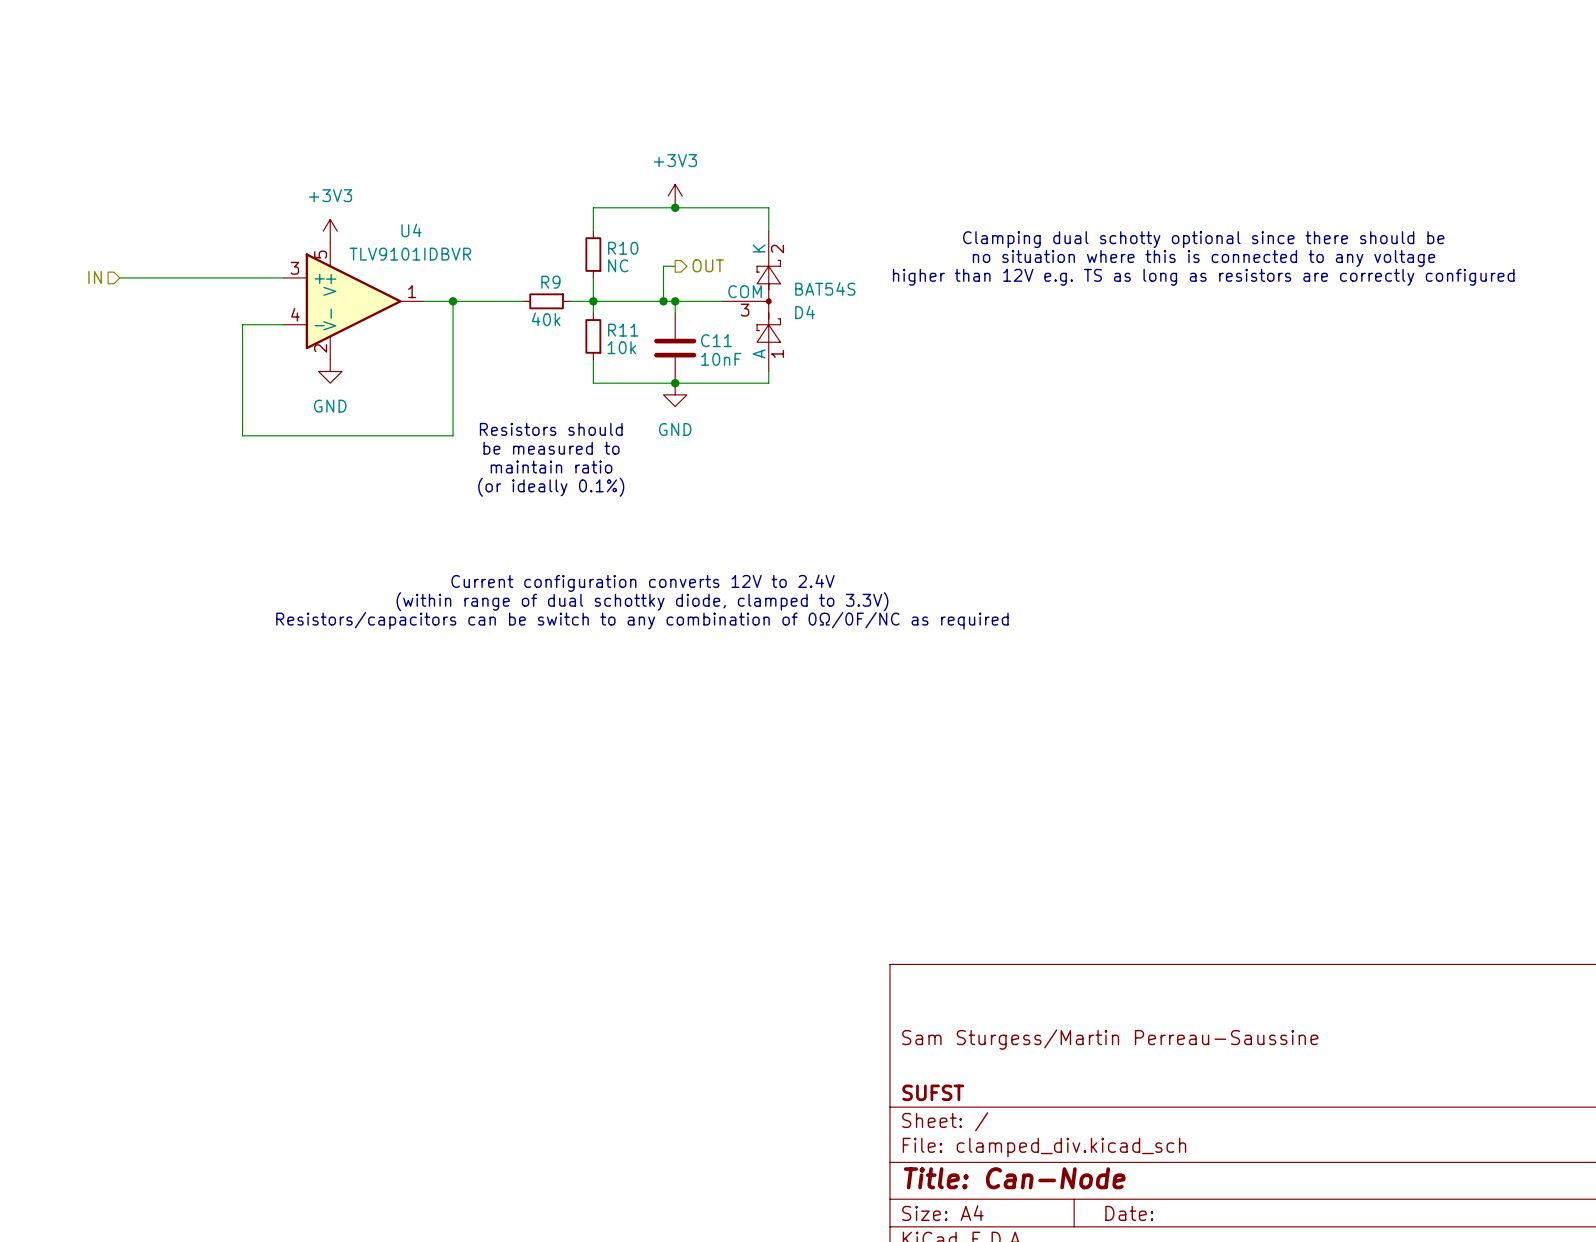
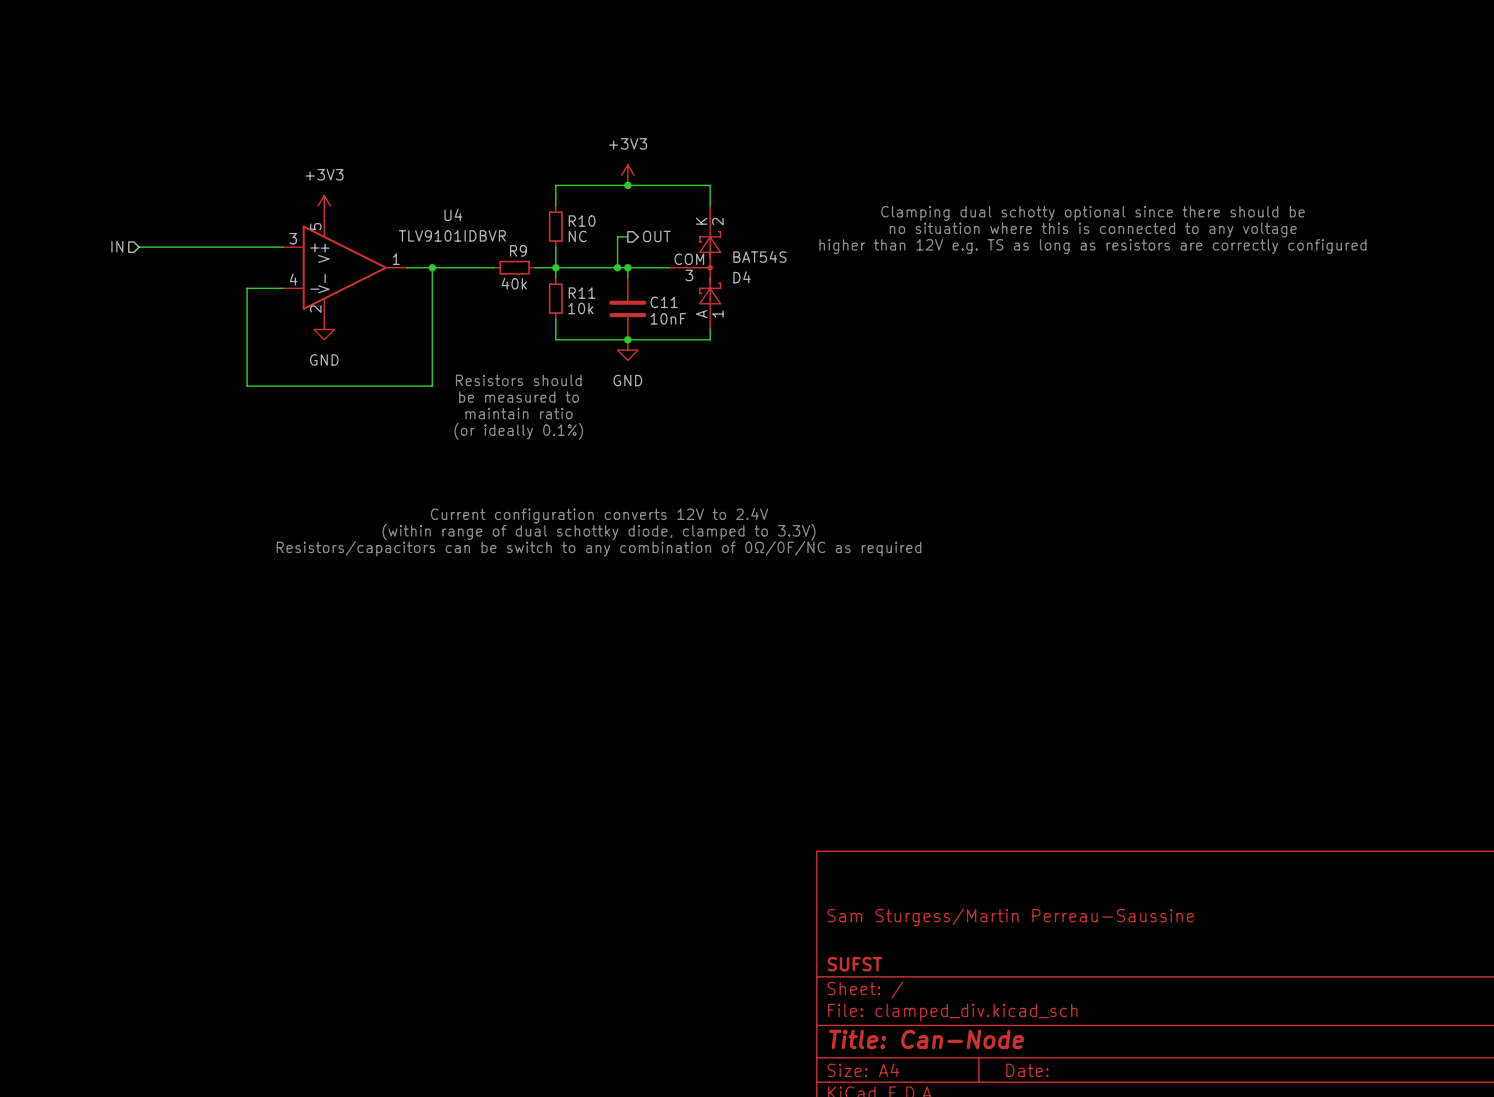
U4 name position: U4 (411, 230) -> U4 (453, 215)
U4 value position: TLV9101IDBVR (410, 254) -> TLV9101IDBVR (452, 235)

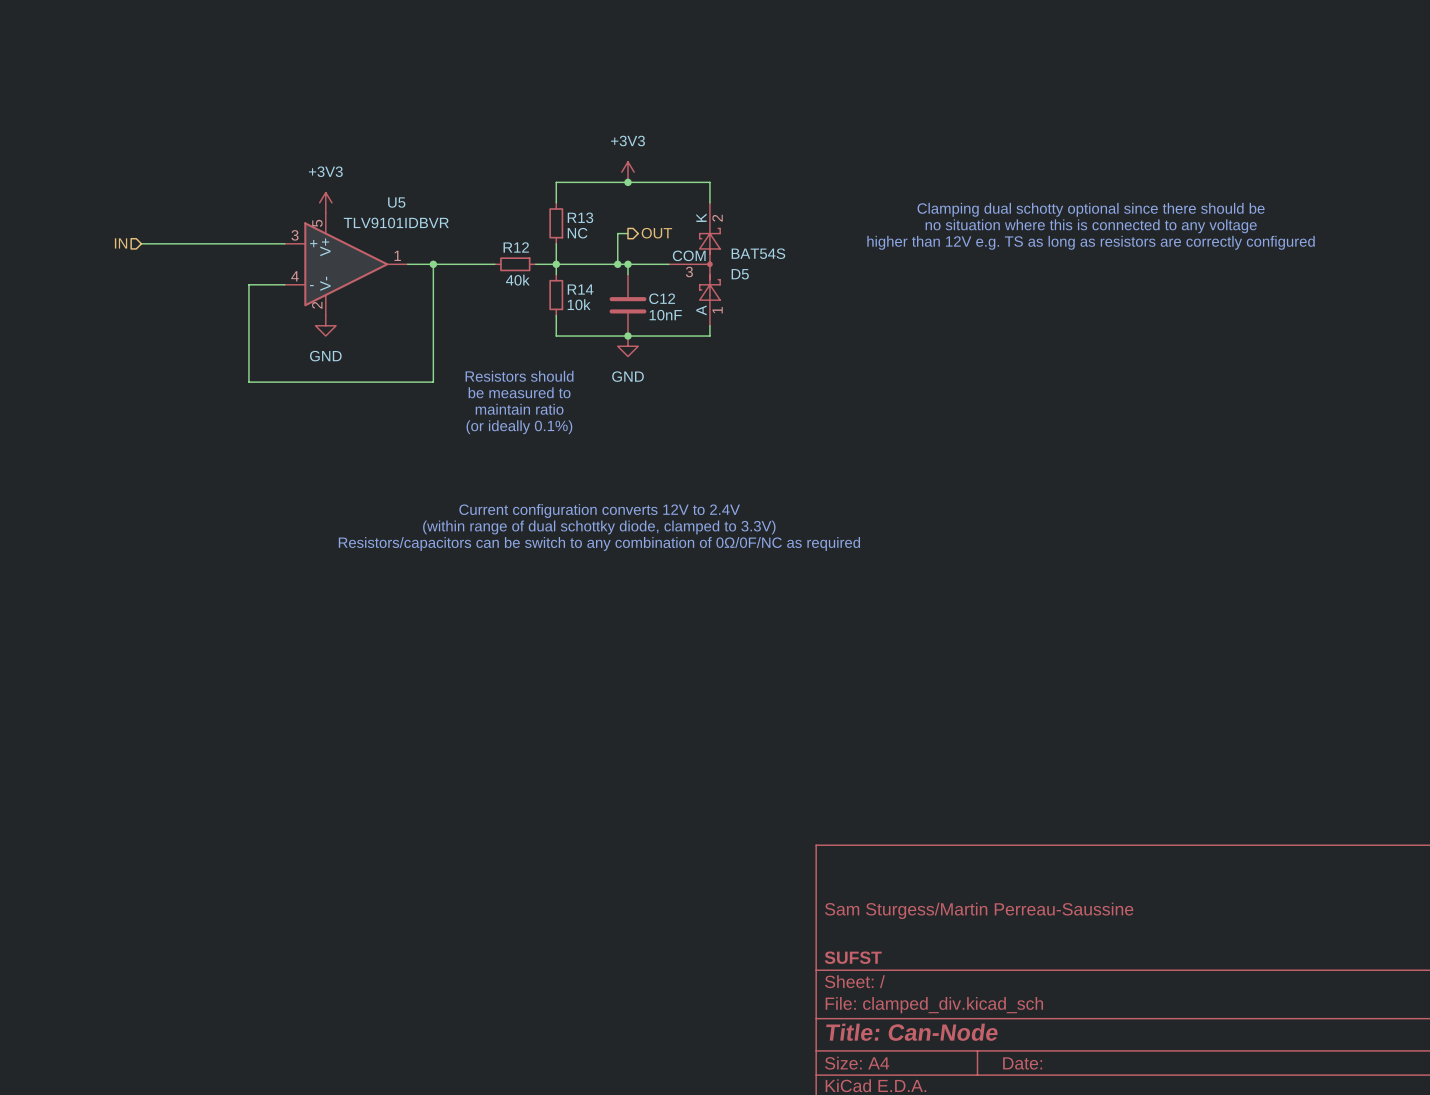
U4 name: U4 (453, 215) -> U5 (396, 202)
R10 name: R10 (582, 221) -> R13 (580, 217)
U4 value position: TLV9101IDBVR (452, 235) -> TLV9101IDBVR (396, 222)
R9 name: R9 (518, 250) -> R12 (516, 247)
D4 name: D4 (742, 277) -> D5 (740, 274)
R11 name: R11 (582, 293) -> R14 (580, 289)
C11 name: C11 (664, 302) -> C12 (662, 298)

